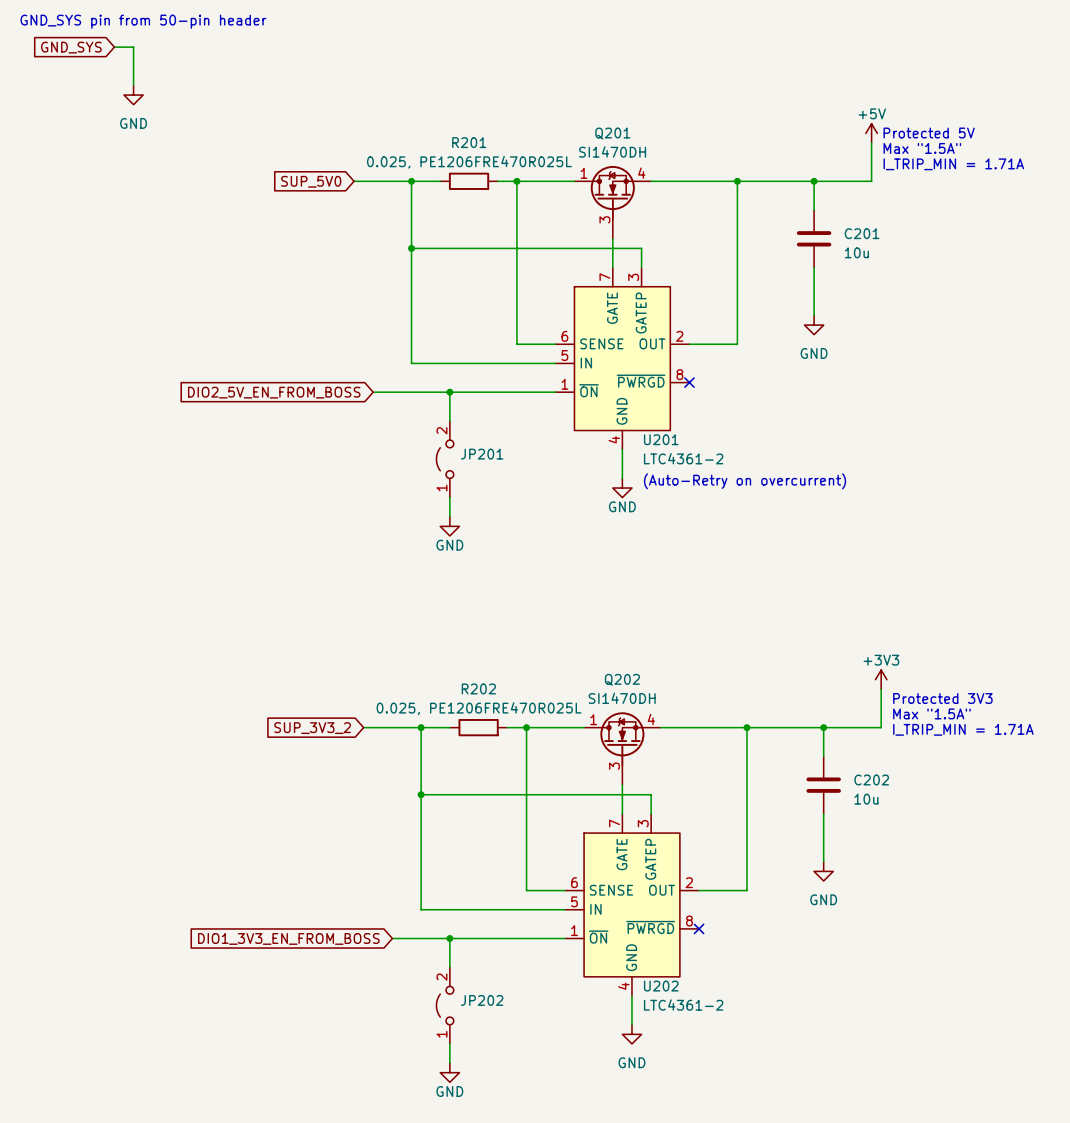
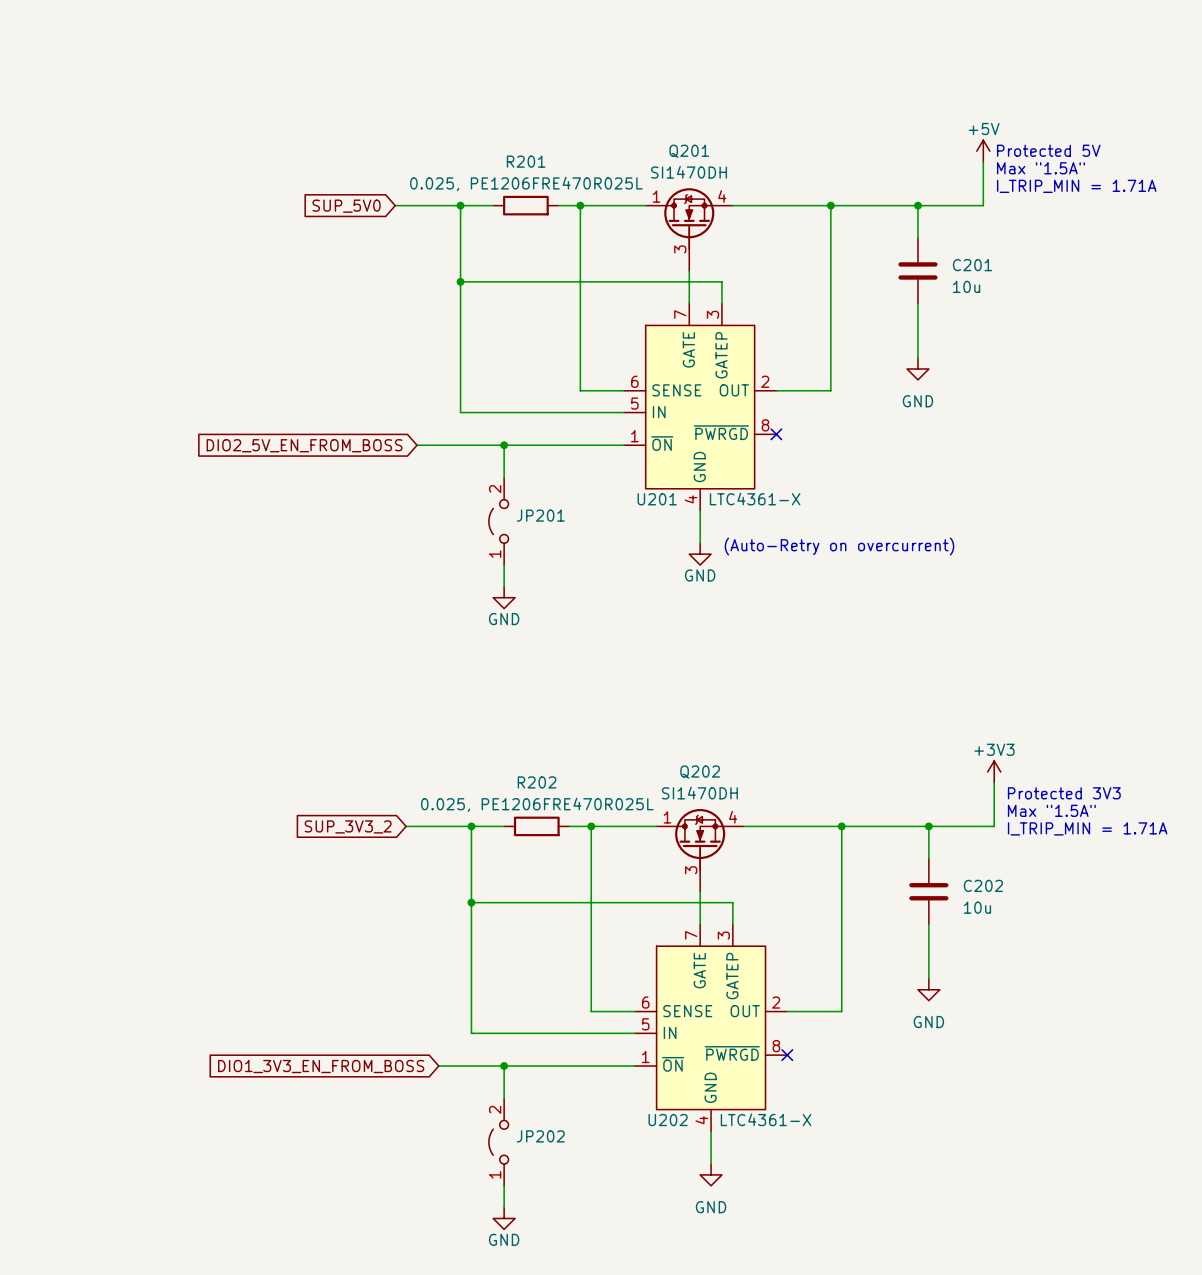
text: GND_SYS pin from 50-pin header (143, 21) -> none
global label: GND_SYS (71, 47) -> none
wire: (114, 47) (133, 47) (133, 85) -> none
power symbol: GND (133, 95) -> none
U201 name position: U201 (661, 439) -> U201 (657, 499)
U201 value: LTC4361-2 (683, 458) -> LTC4361-X (755, 499)
U202 name position: U202 (661, 986) -> U202 (668, 1120)
U202 value: LTC4361-2 (683, 1005) -> LTC4361-X (766, 1119)

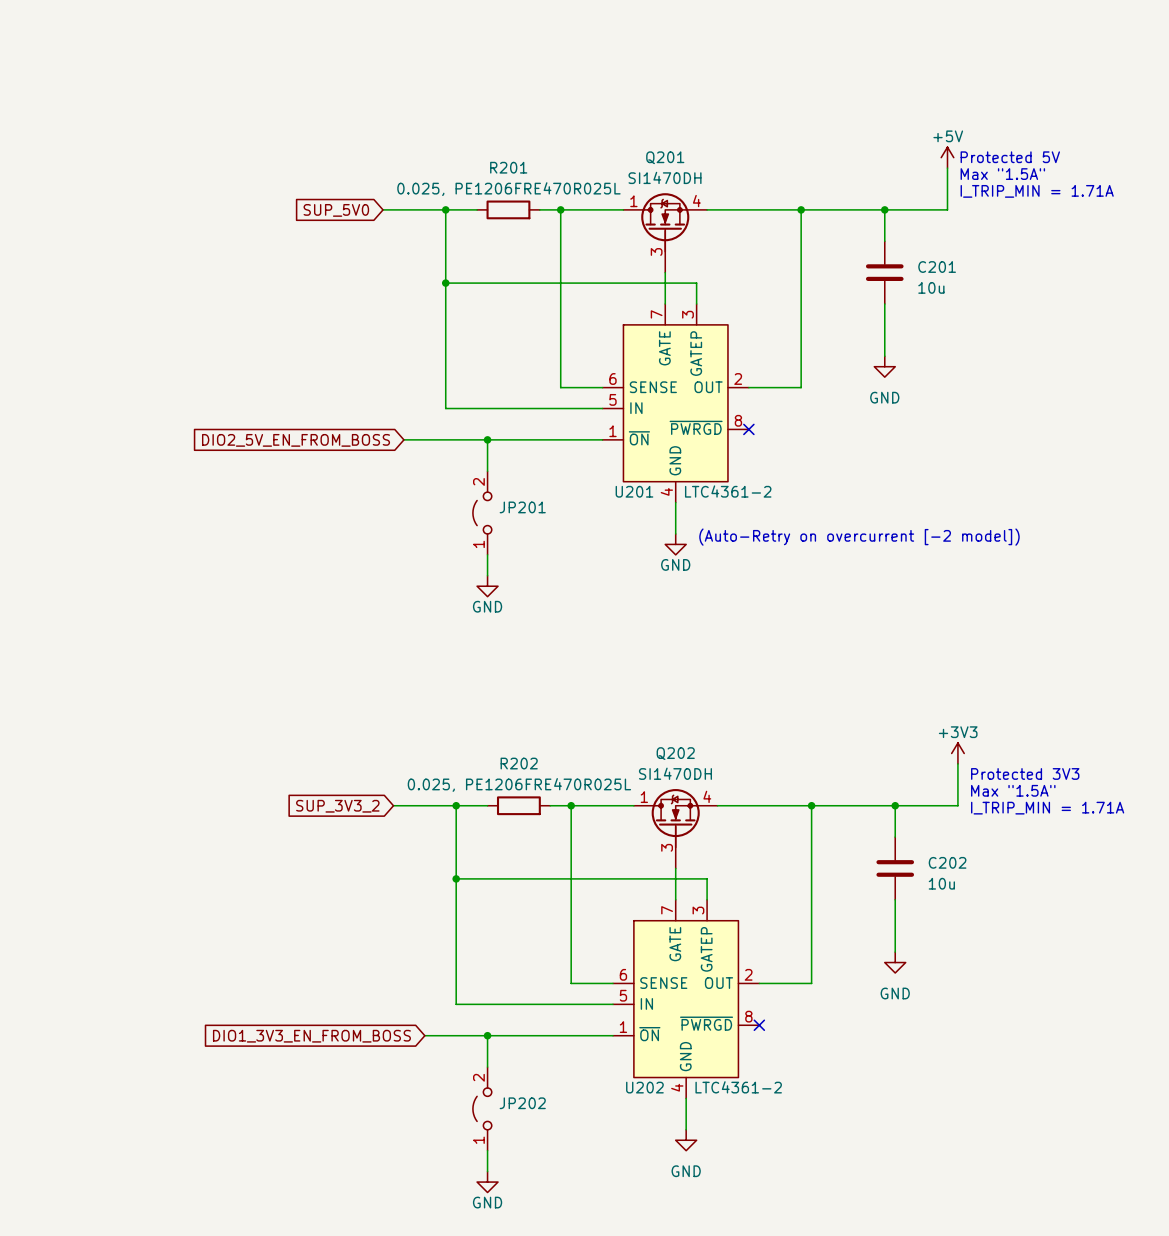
U201 value: LTC4361-X (755, 499) -> LTC4361-2 (728, 491)
text: (Auto-Retry on overcurrent) (839, 546) -> (Auto-Retry on overcurrent [-2 model]) (859, 537)
U202 value: LTC4361-X (766, 1119) -> LTC4361-2 (738, 1087)

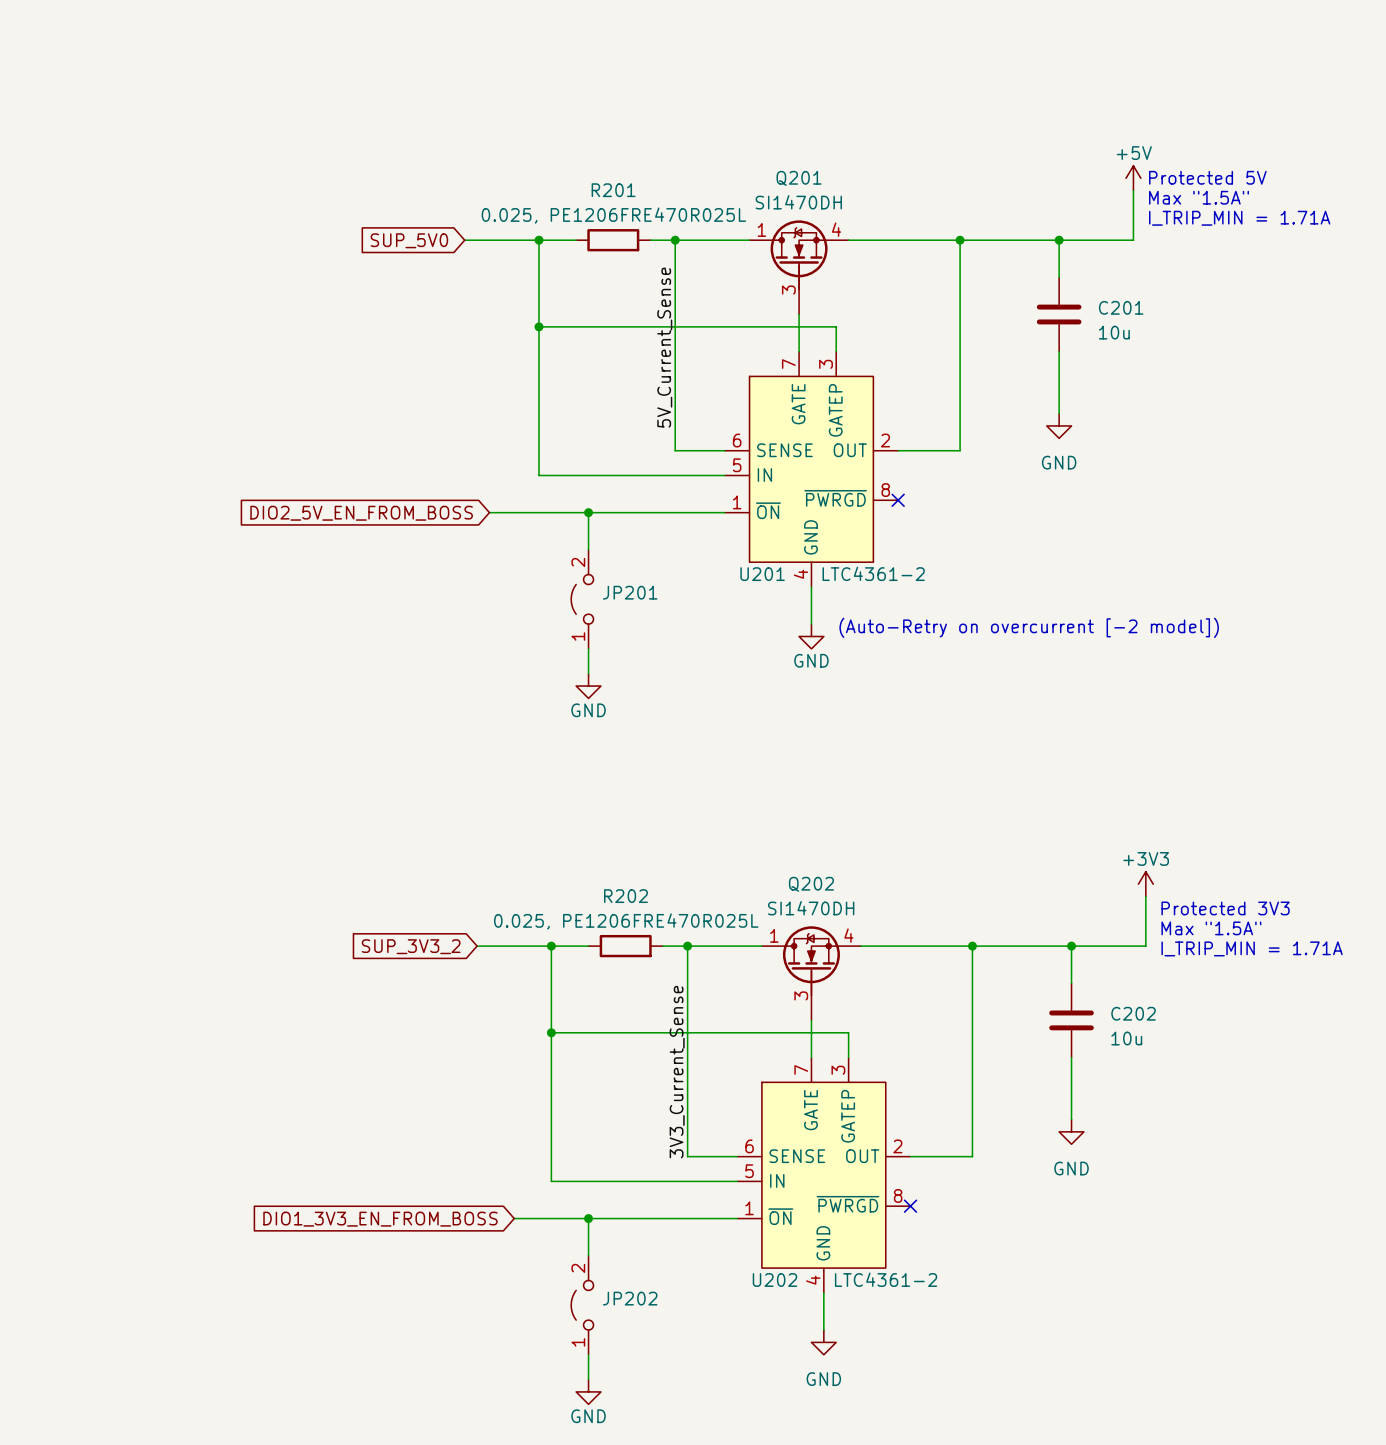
label: none -> 5V_Current_Sense (664, 347)
label: none -> 3V3_Current_Sense (677, 1072)

